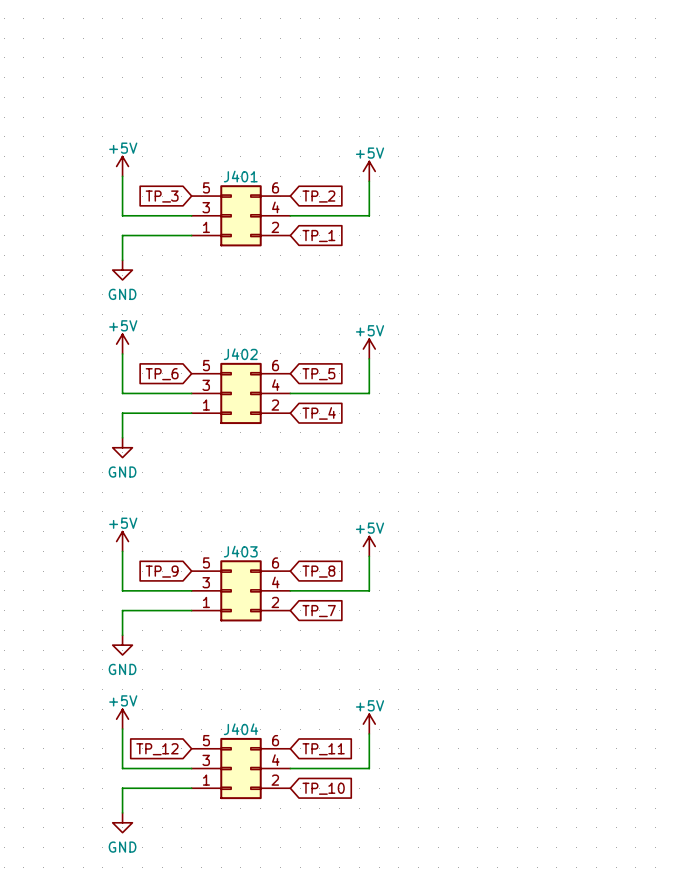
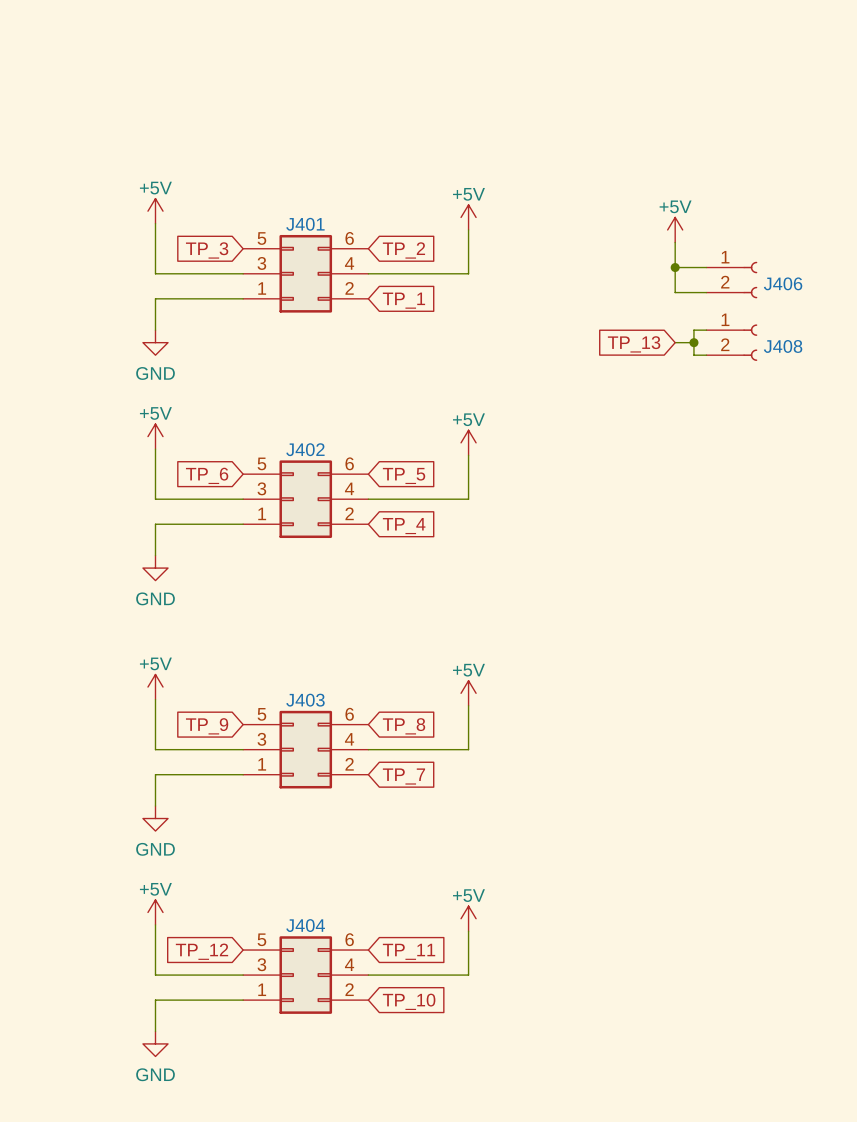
power symbol: none -> +5V (675, 229)
wire: none -> (675, 242) (675, 292) (706, 292)
wire: none -> (675, 267) (706, 267)
junction: none -> (675, 267)
J406: none -> (731, 280)
wire: none -> (706, 330) (693, 330) (693, 355) (706, 355)
global label: none -> TP_13 (634, 344)
wire: none -> (675, 342) (693, 342)
junction: none -> (693, 342)
J408: none -> (731, 342)

